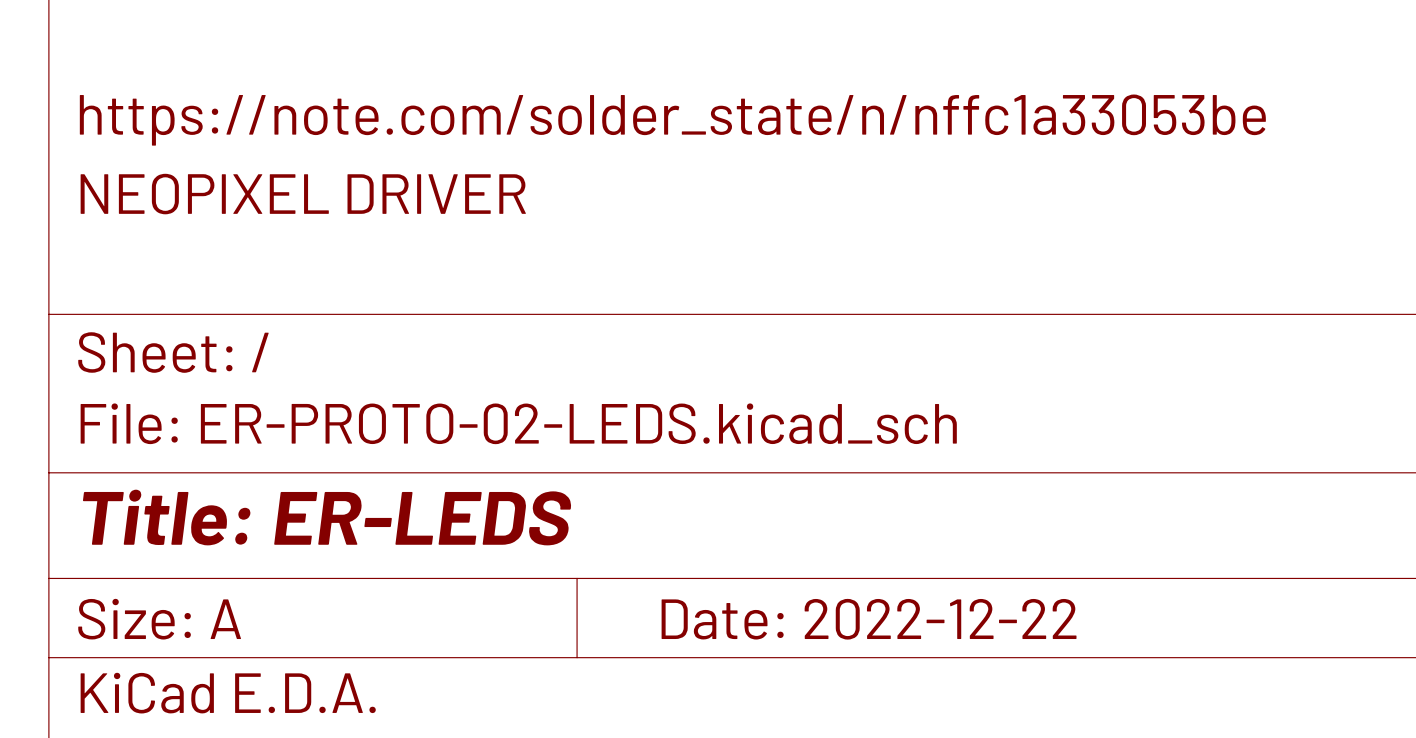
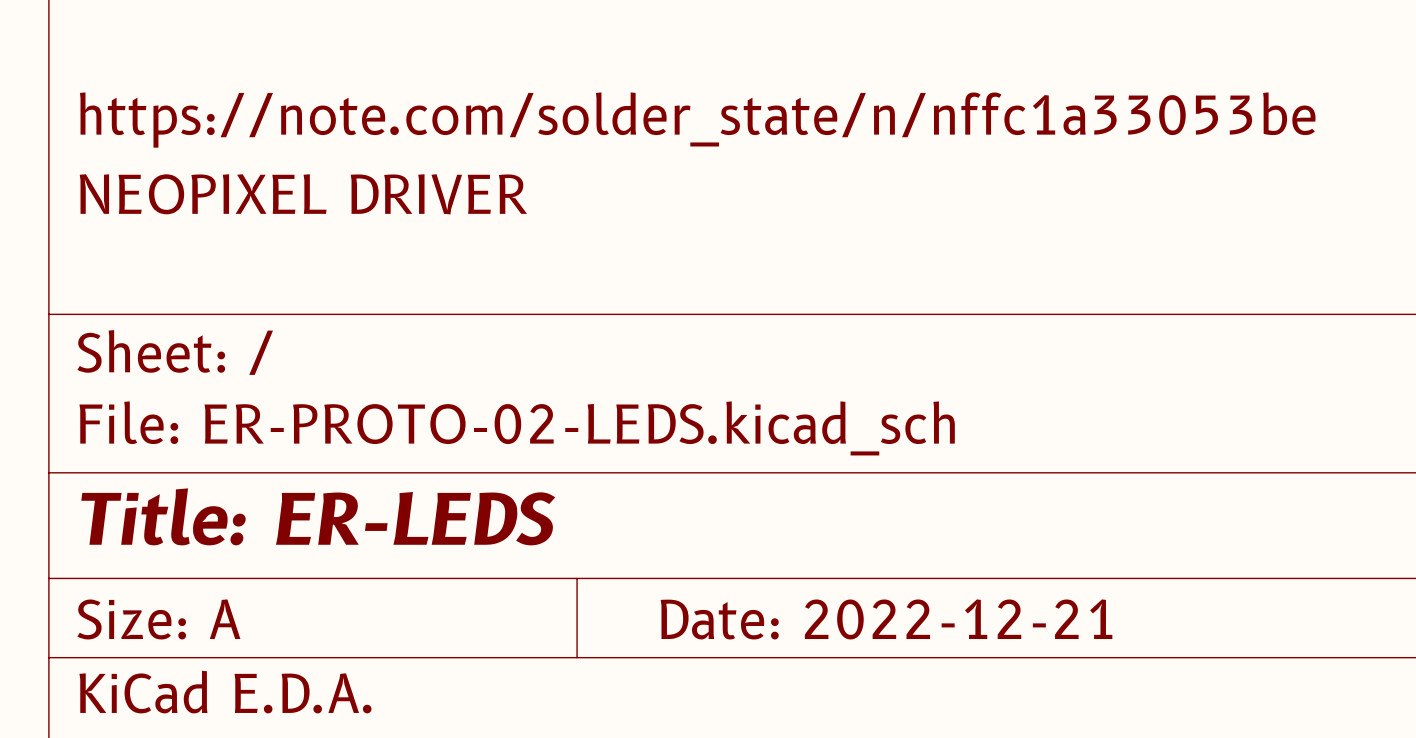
title block: Date: 2022-12-22 (869, 619) -> Date: 2022-12-21 (886, 619)

